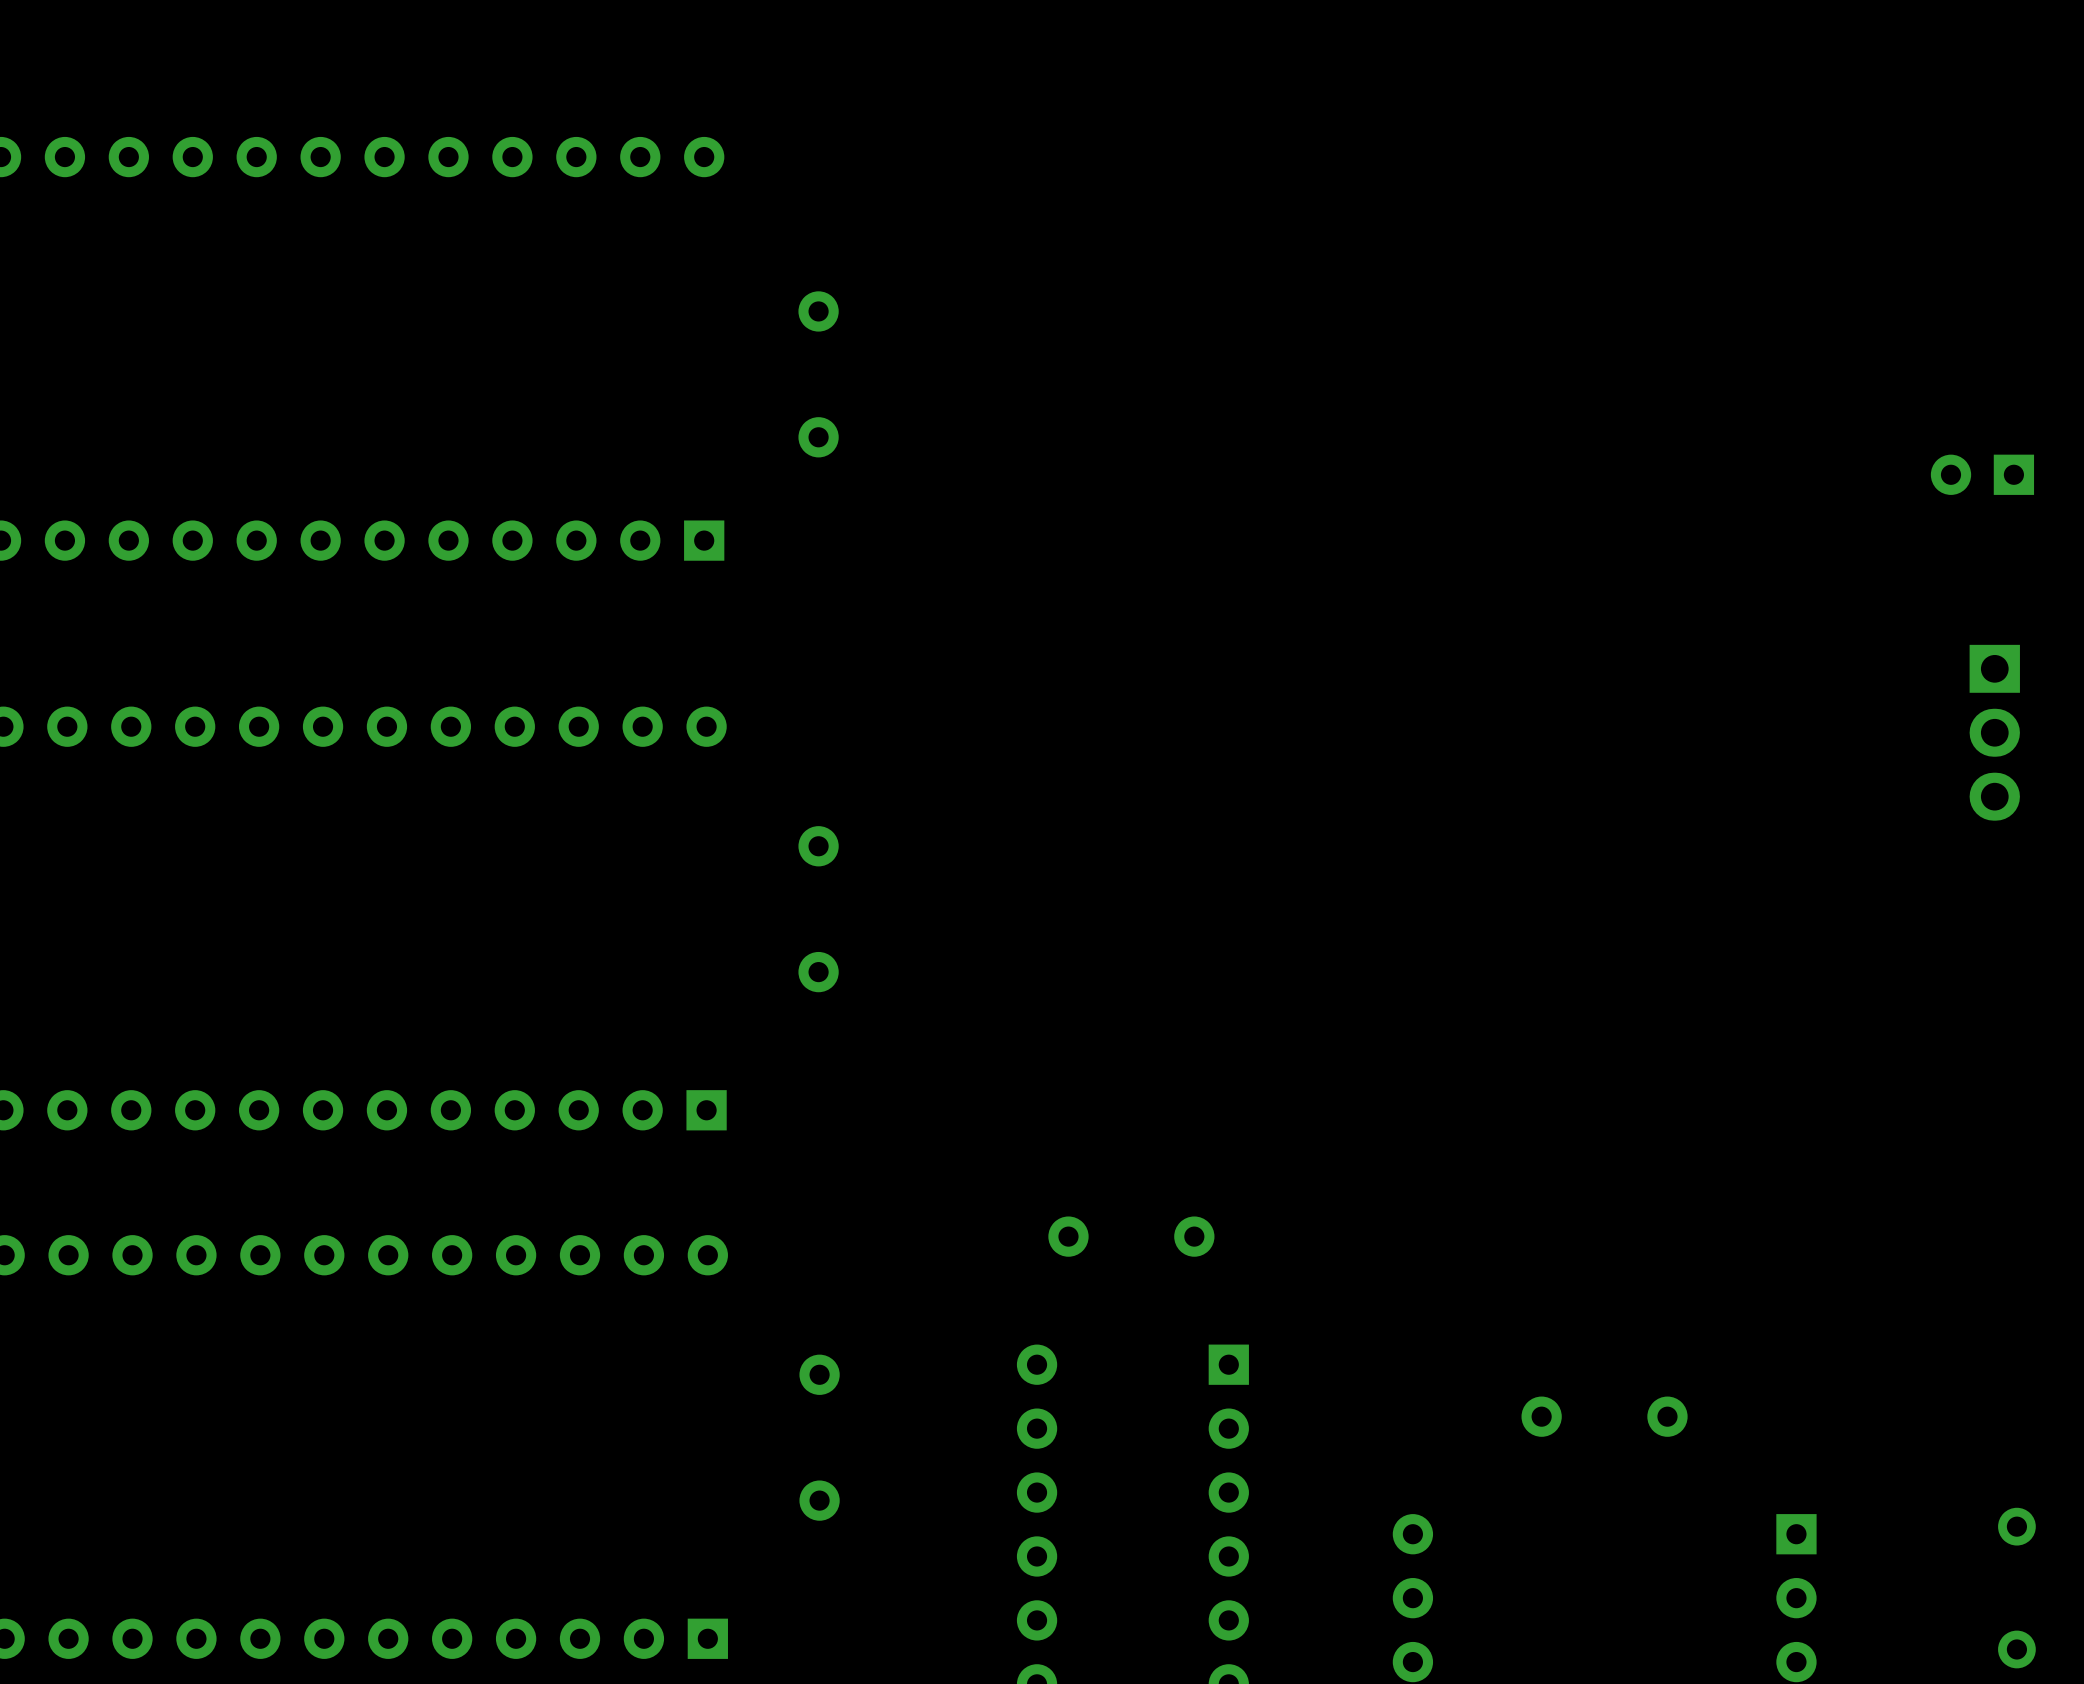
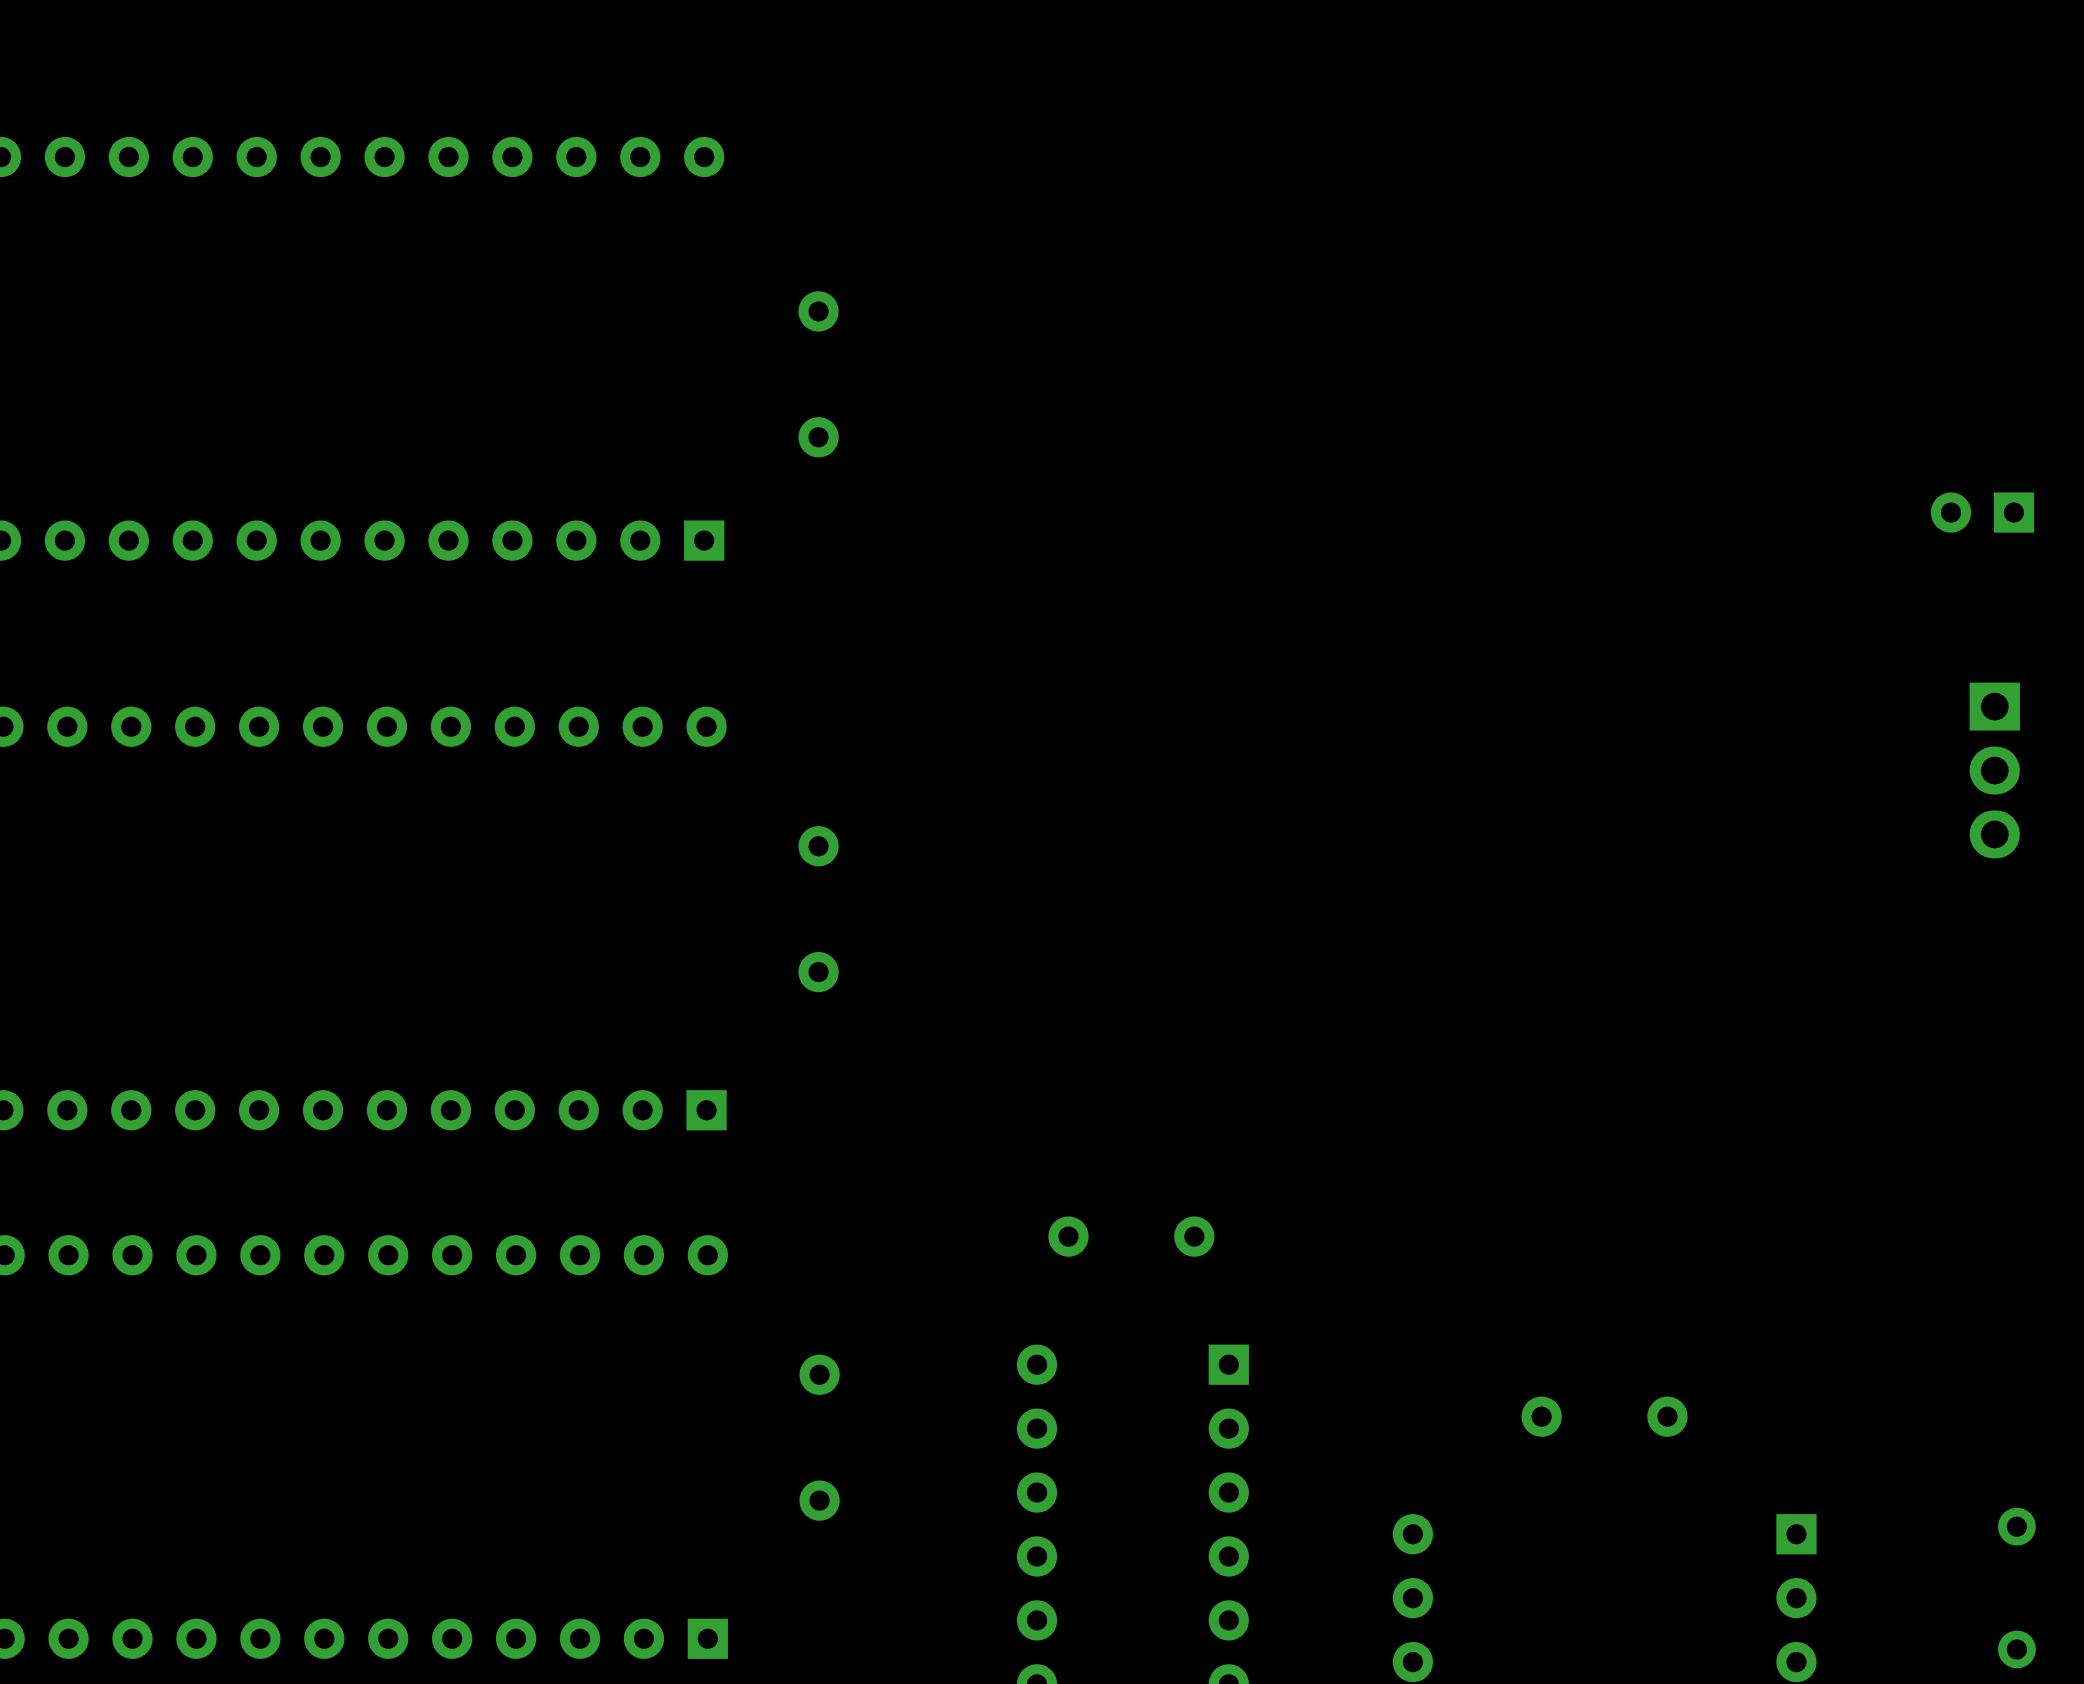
part position: (1982, 474) -> (1982, 512)
part position: (1994, 732) -> (1994, 770)

